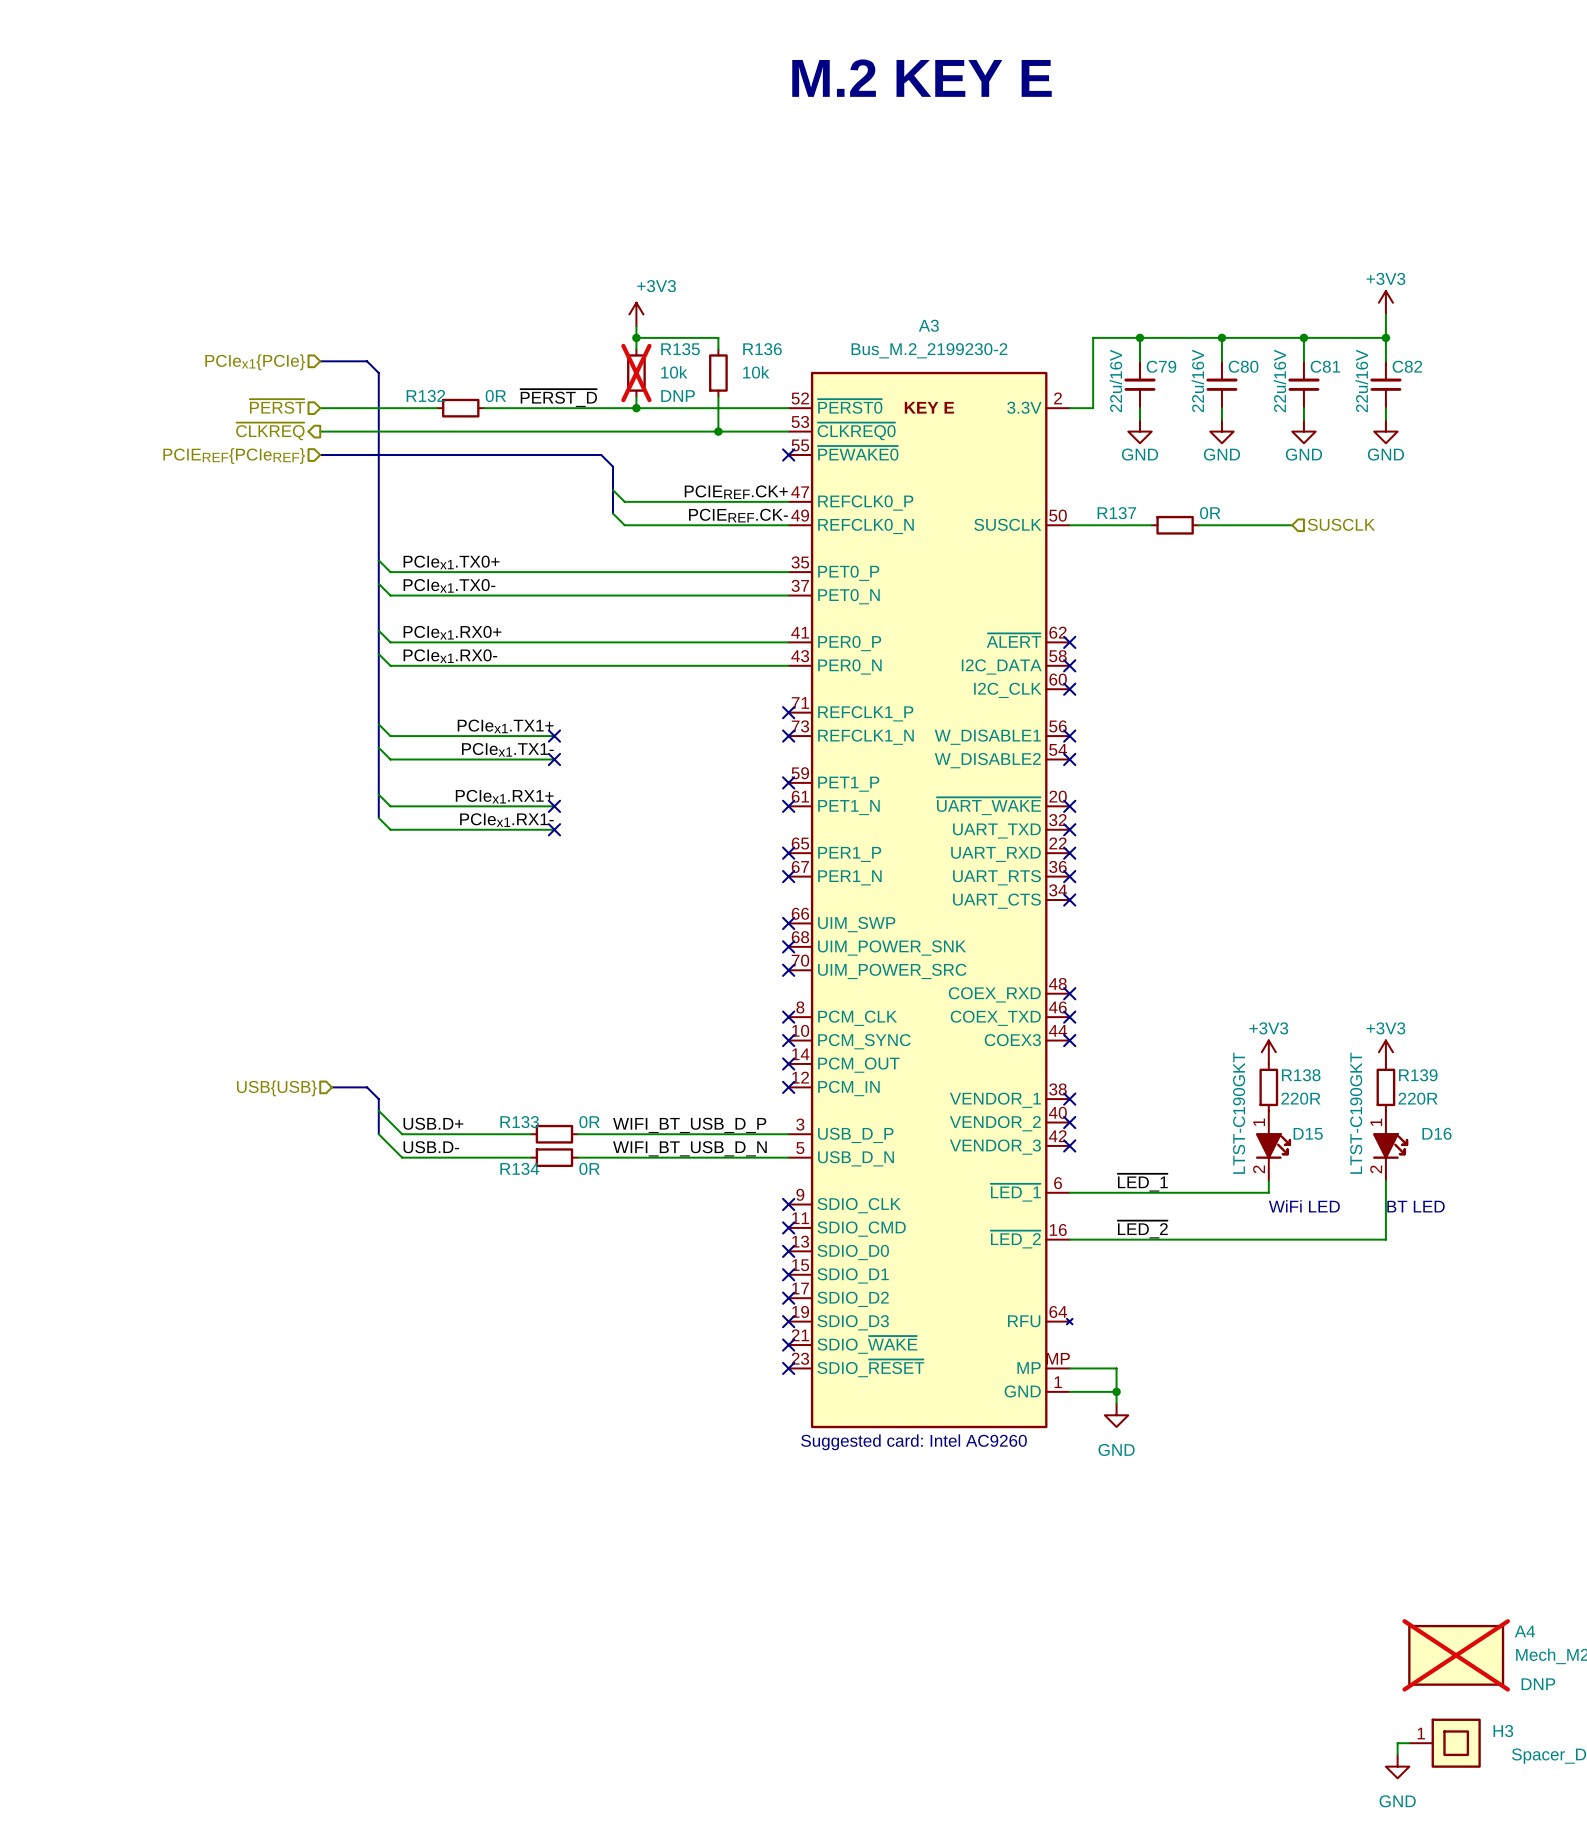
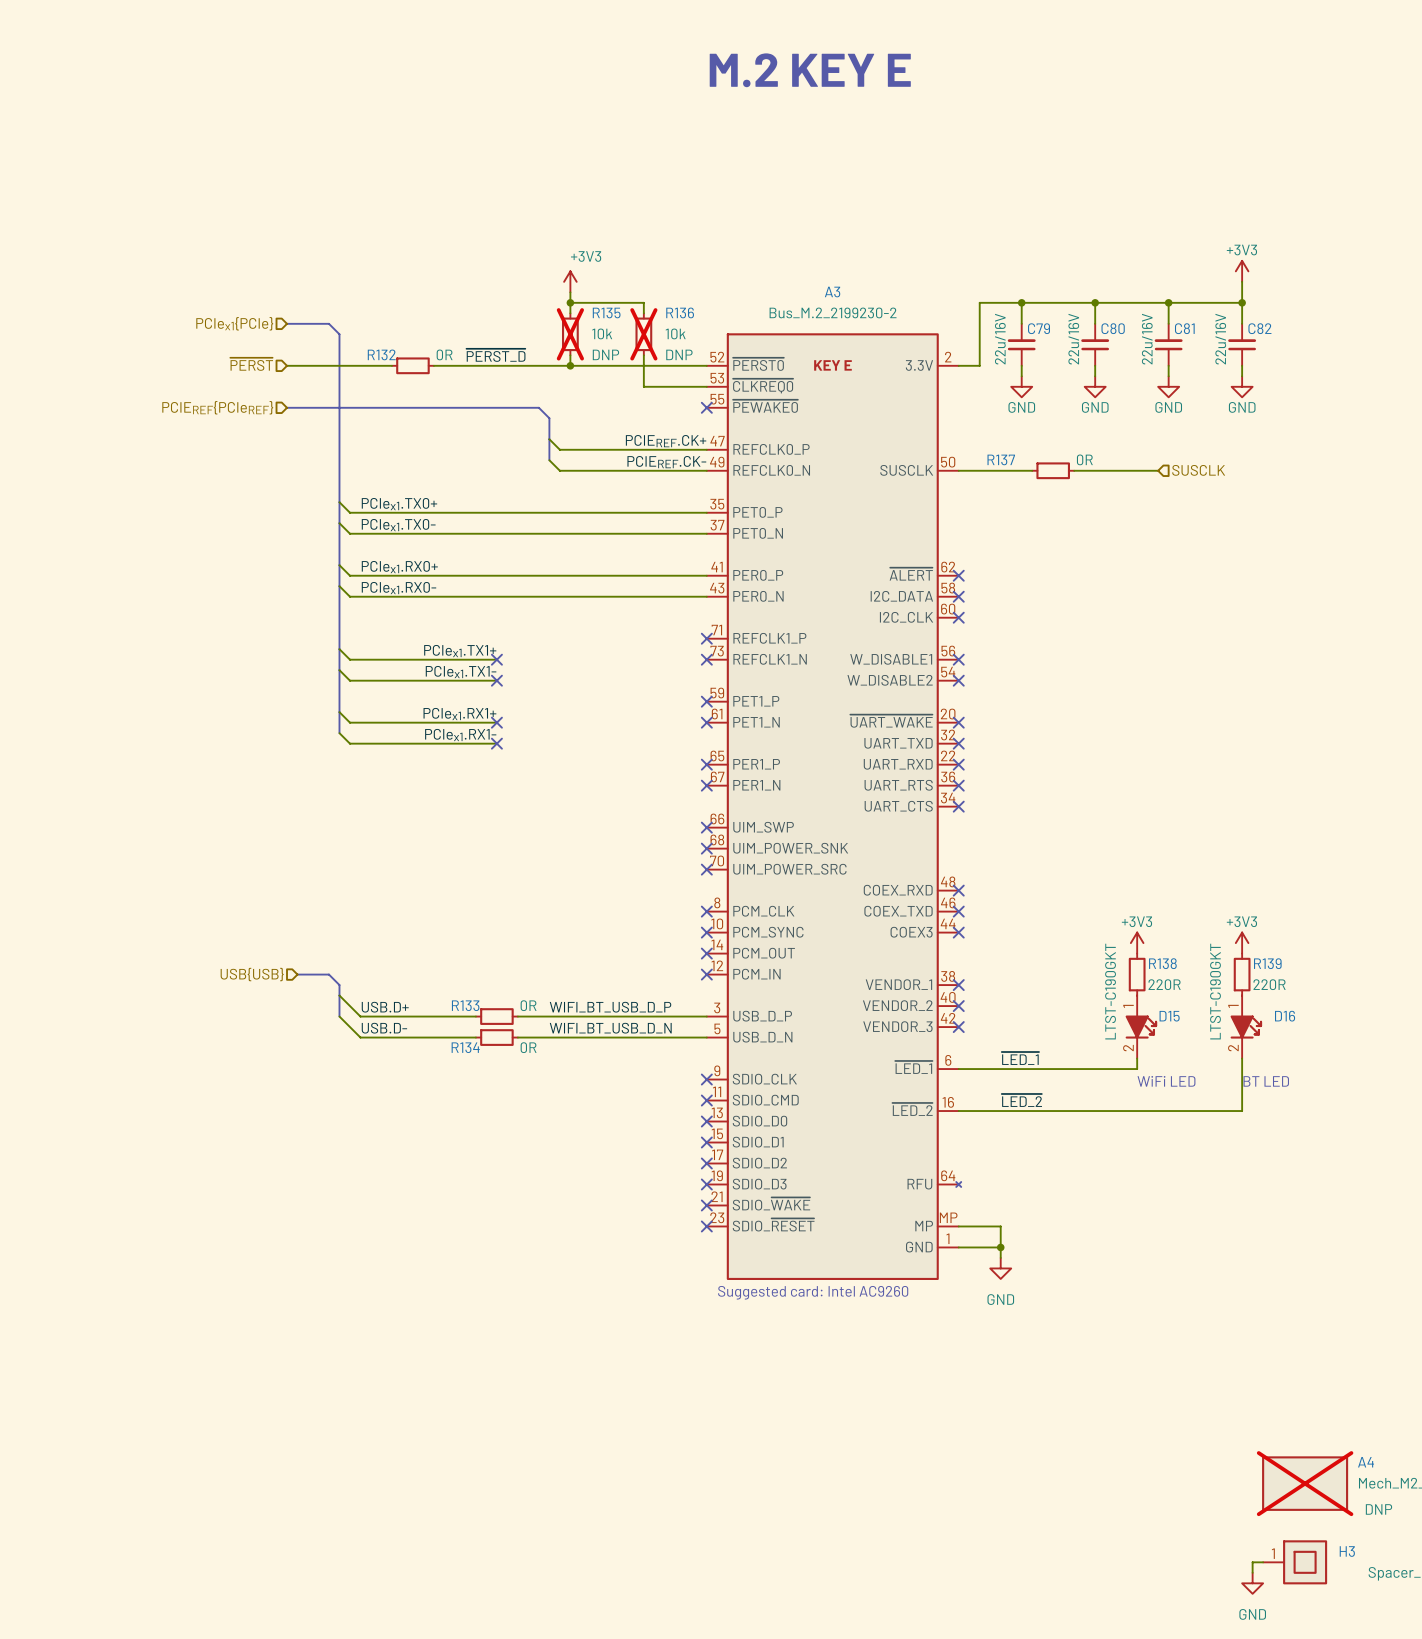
R136 do-not-place cross: none -> (643, 334)
R136 text: none -> DNP (679, 354)
hierarchical label: ~{CLKREQ} (270, 431) -> none
wire: (320, 431) (718, 431) -> none
junction: (718, 431) -> none

